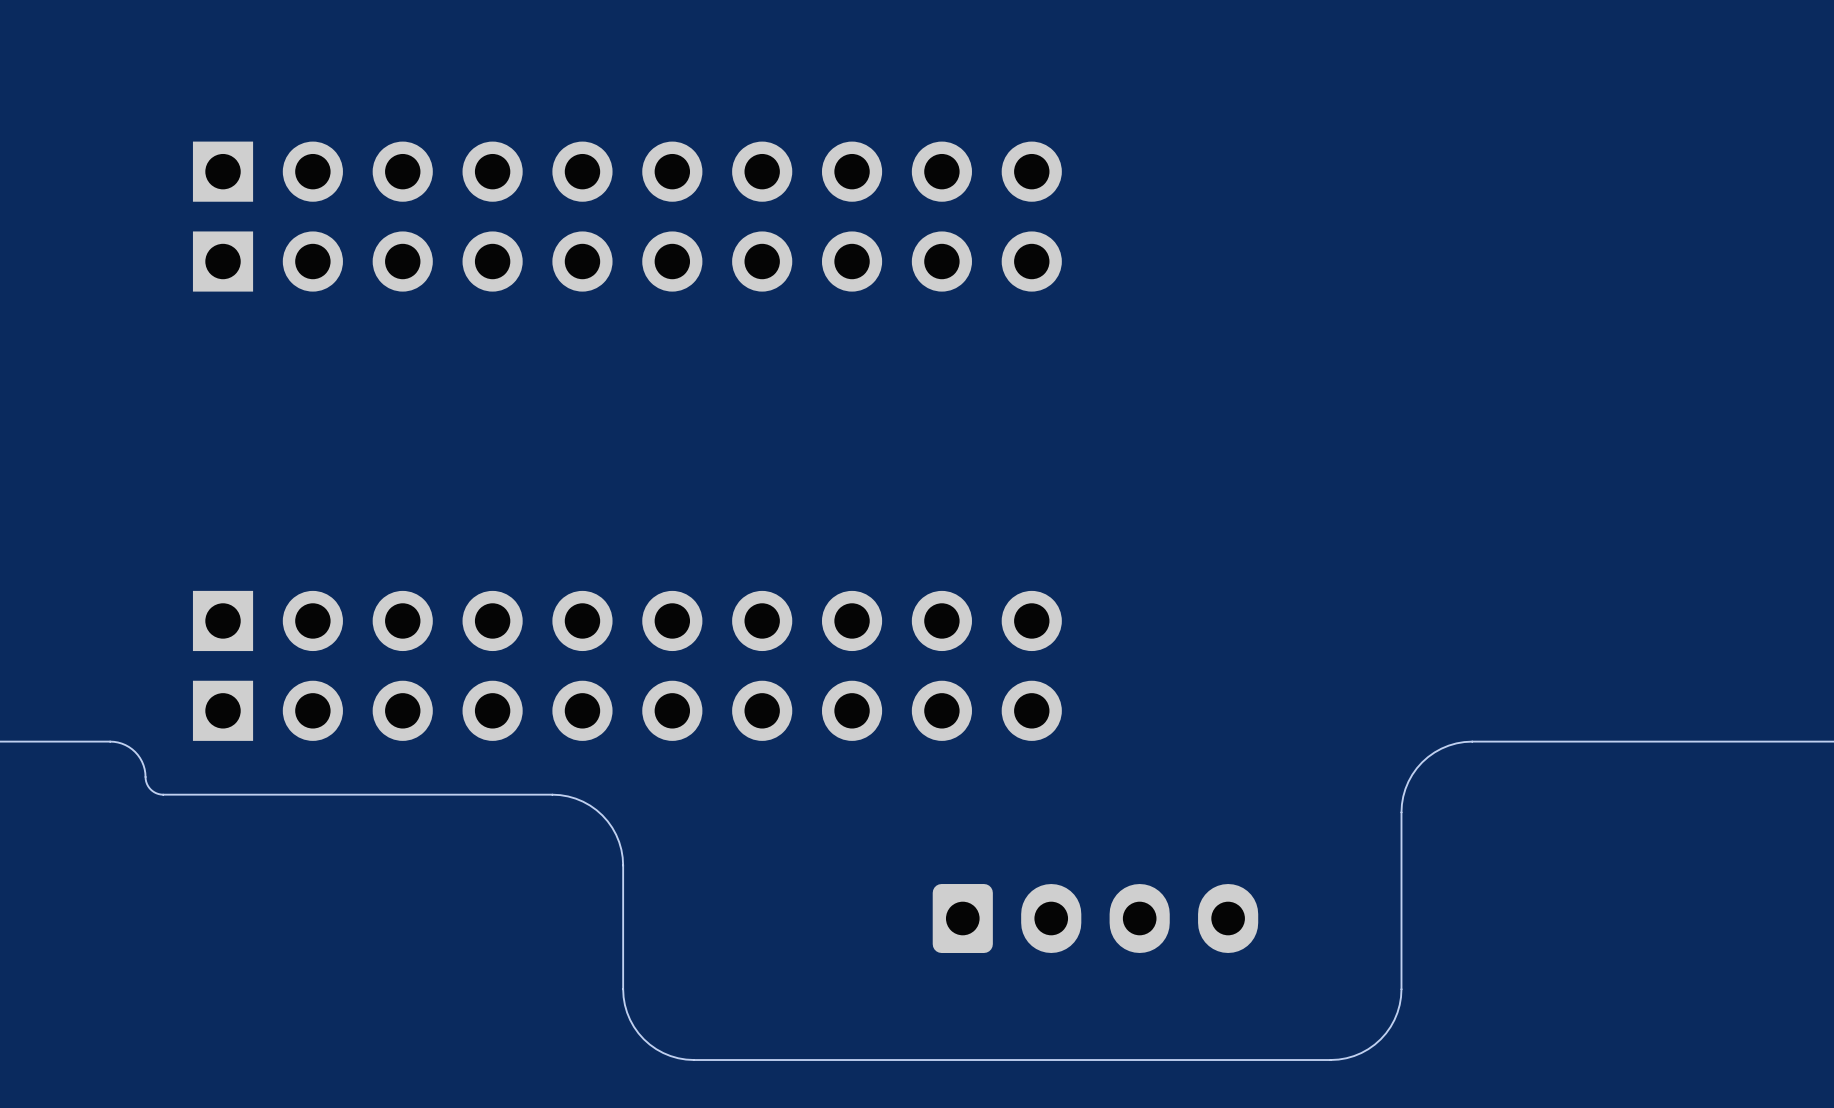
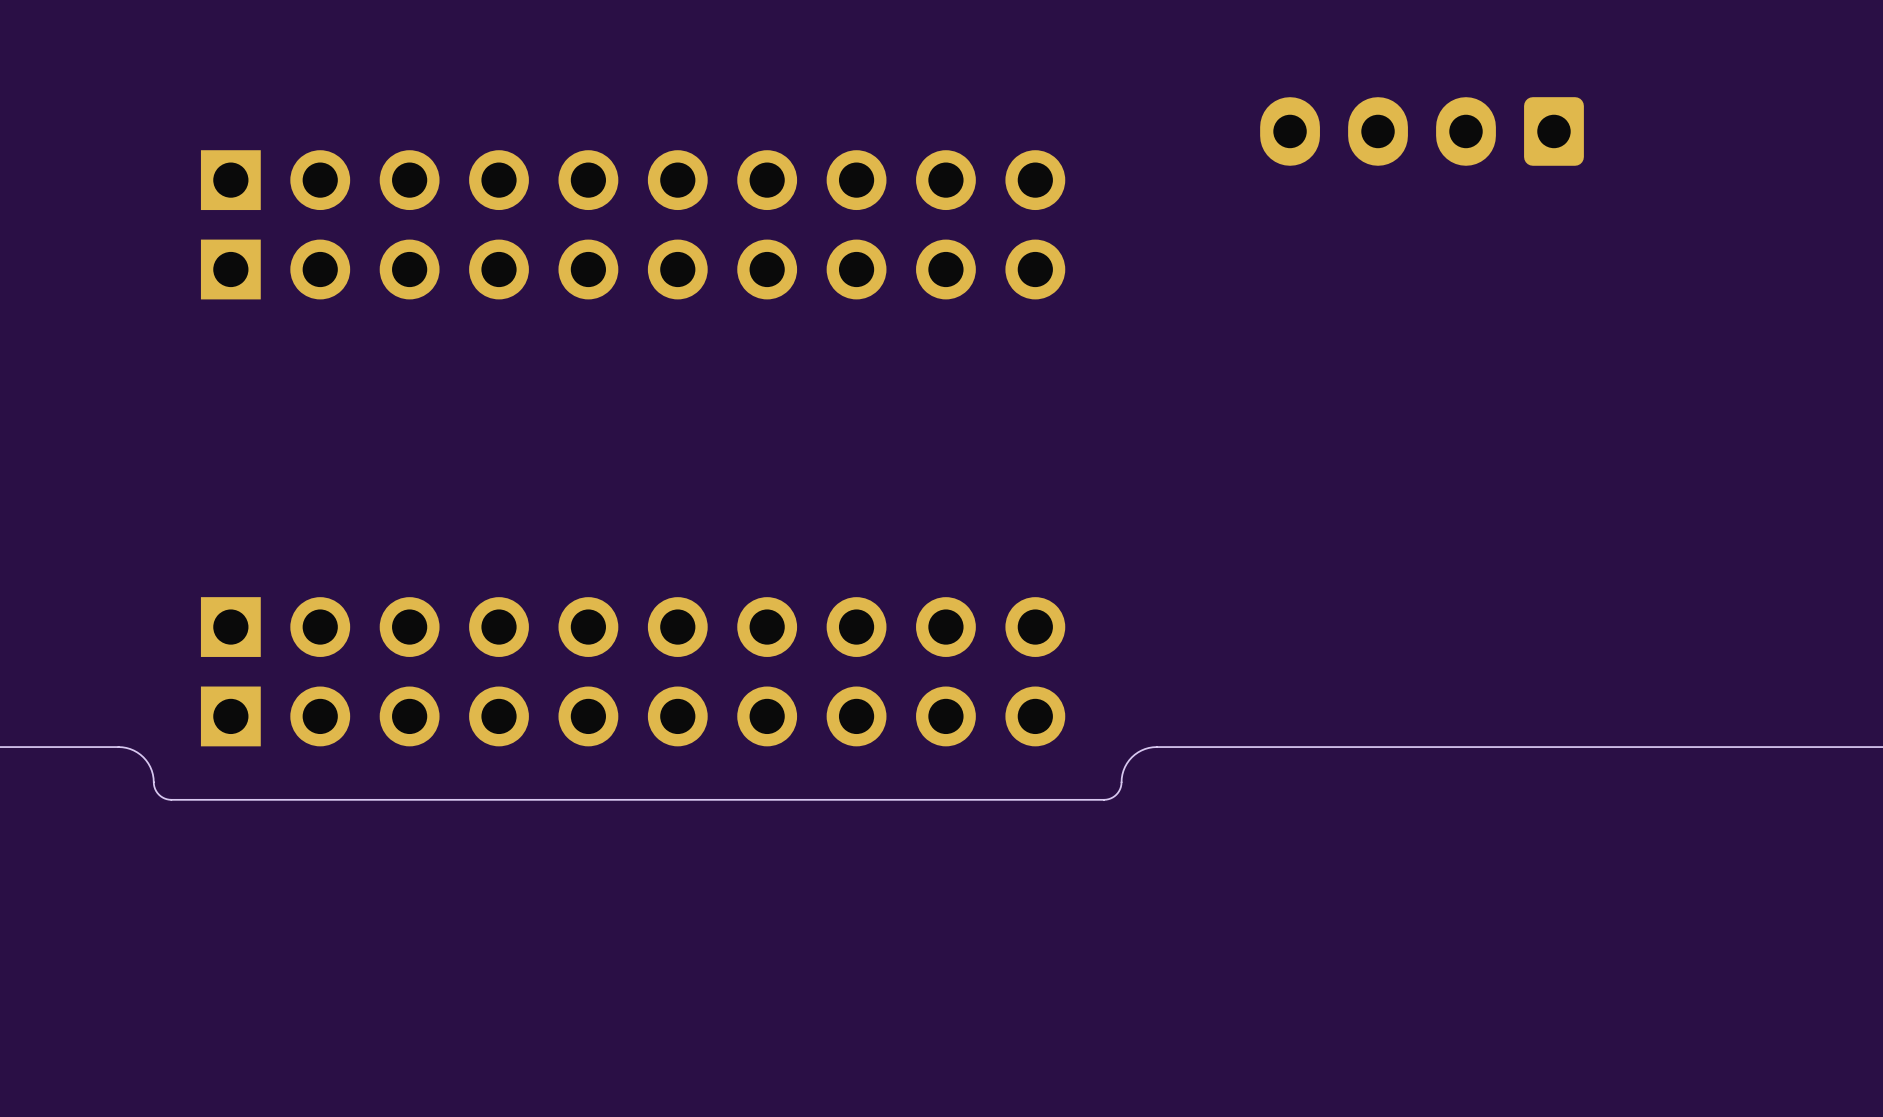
board edge: (1472, 741) (1448, 745) (1434, 752) (1416, 768) (1408, 781) (1403, 796) (1401, 812) (1401, 989) (1399, 1005) (1390, 1026) (1380, 1039) (1361, 1053) (1338, 1059) (693, 1060) (670, 1056) (656, 1049) (643, 1039) (630, 1019) (624, 1005) (623, 989) (623, 865) (621, 849) (616, 834) (607, 821) (590, 805) (575, 798) (552, 794) -> (1473, 747) (1152, 747) (1141, 750) (1131, 757) (1123, 770) (1119, 791) (1112, 797) (1103, 799) (558, 799)
part rotation: 0° (1095, 918) -> 180° (1422, 131)
part position: (1095, 918) -> (1422, 131)

